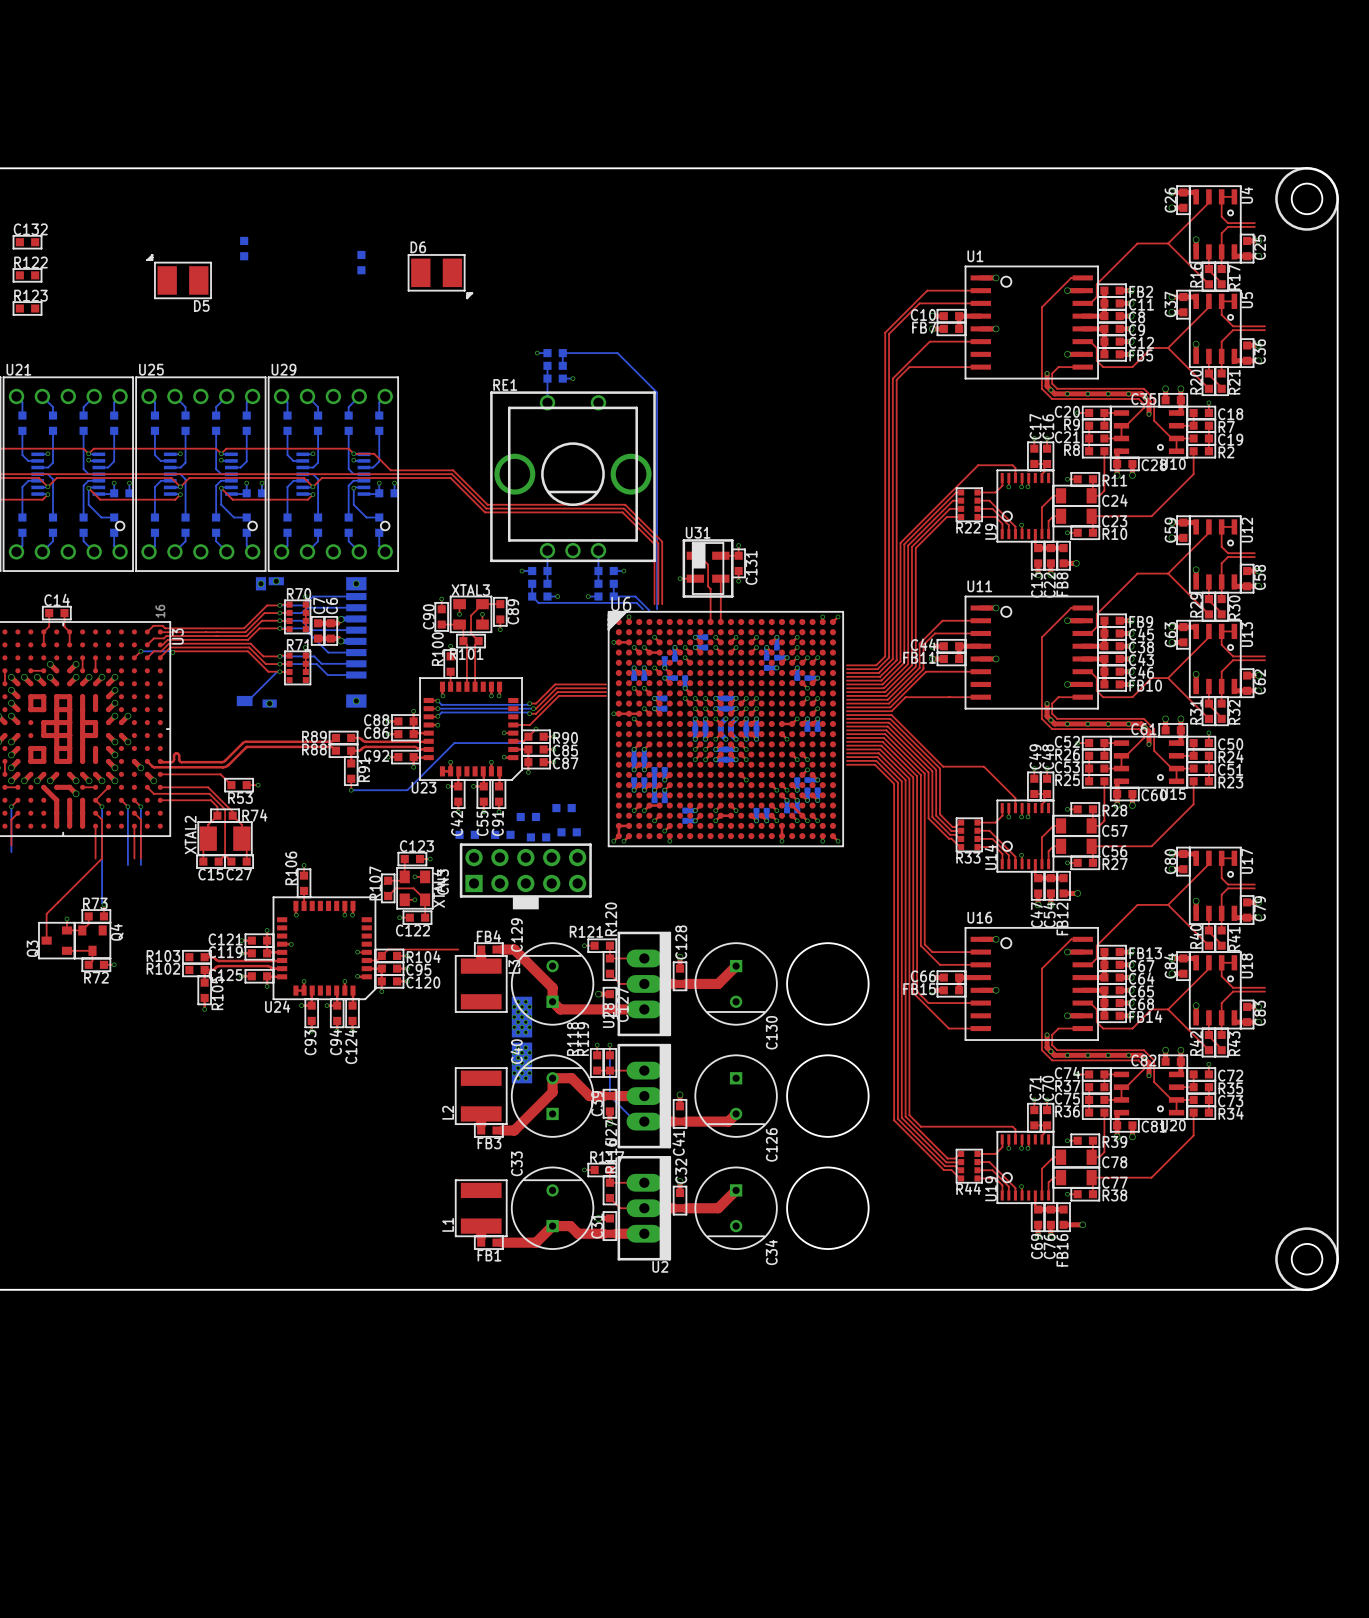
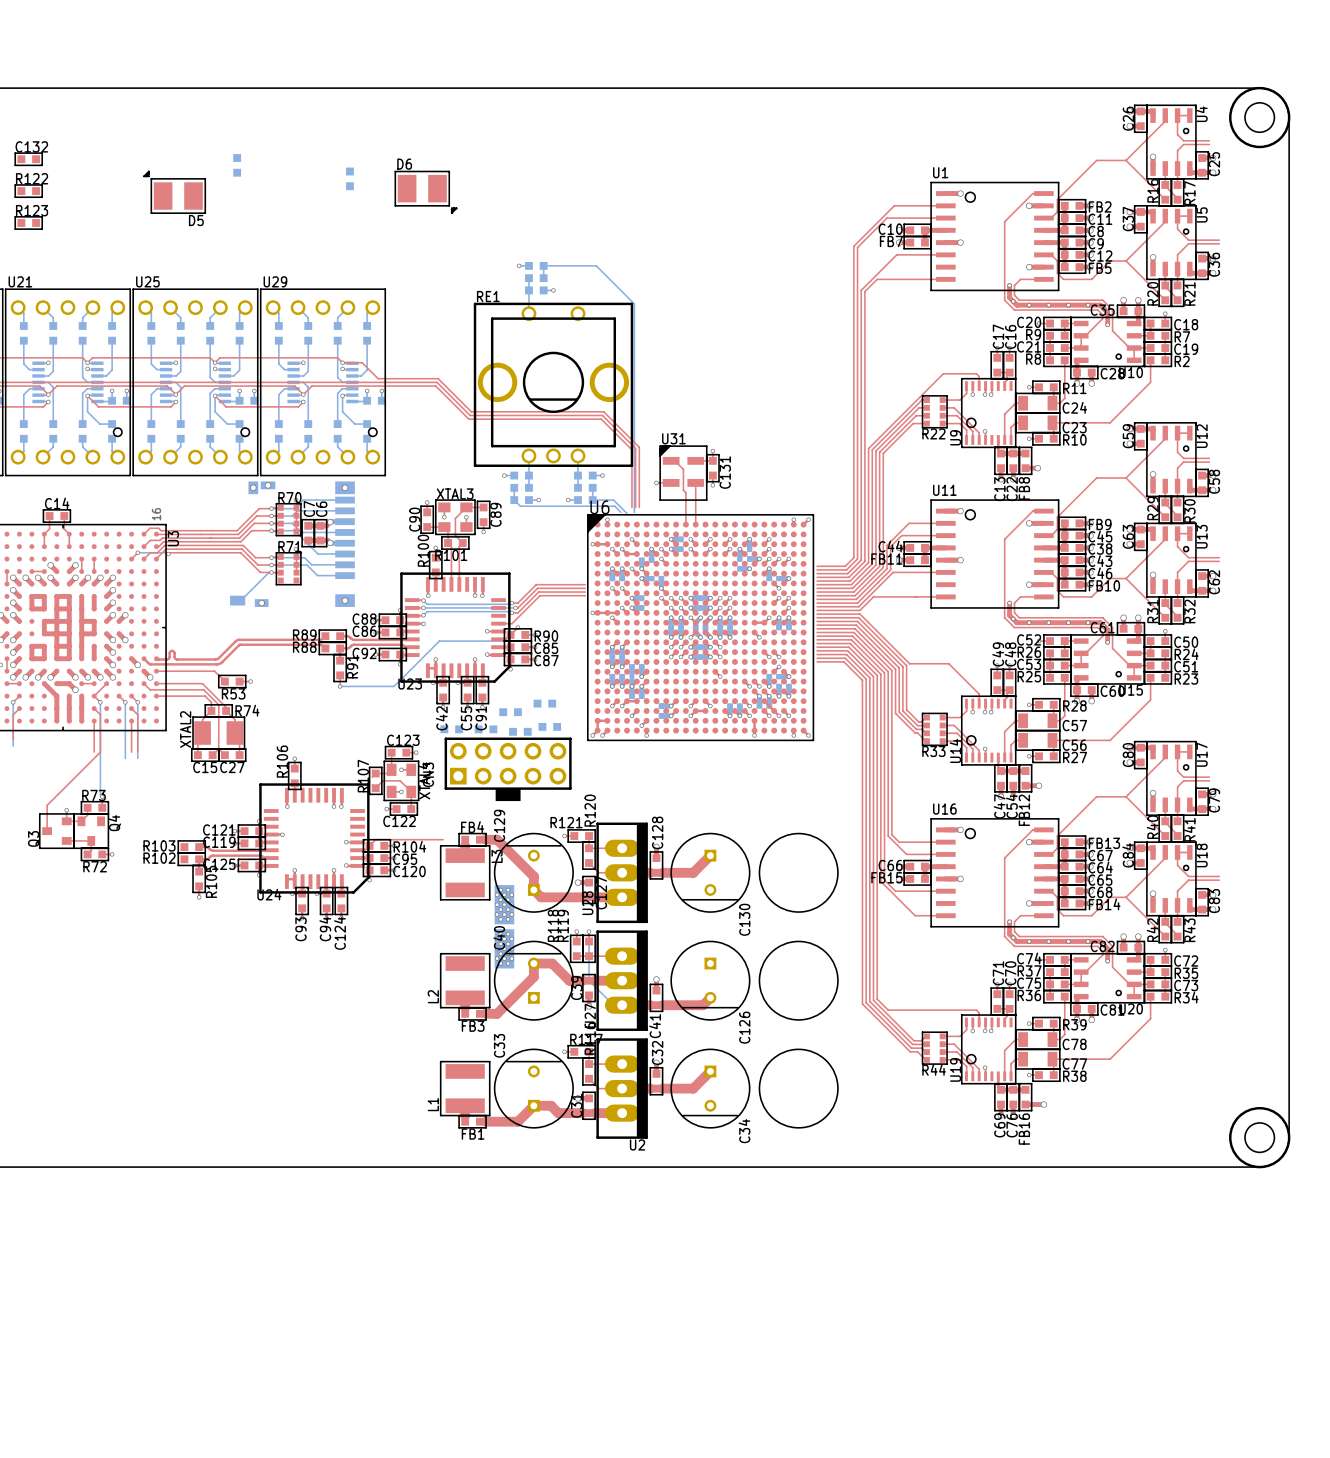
U31 footprint: [682, 539, 734, 598] -> [659, 445, 708, 501]
U23 footprint: [419, 677, 523, 781] -> [400, 572, 511, 683]
U24 footprint: [272, 896, 377, 1001] -> [259, 783, 370, 894]

